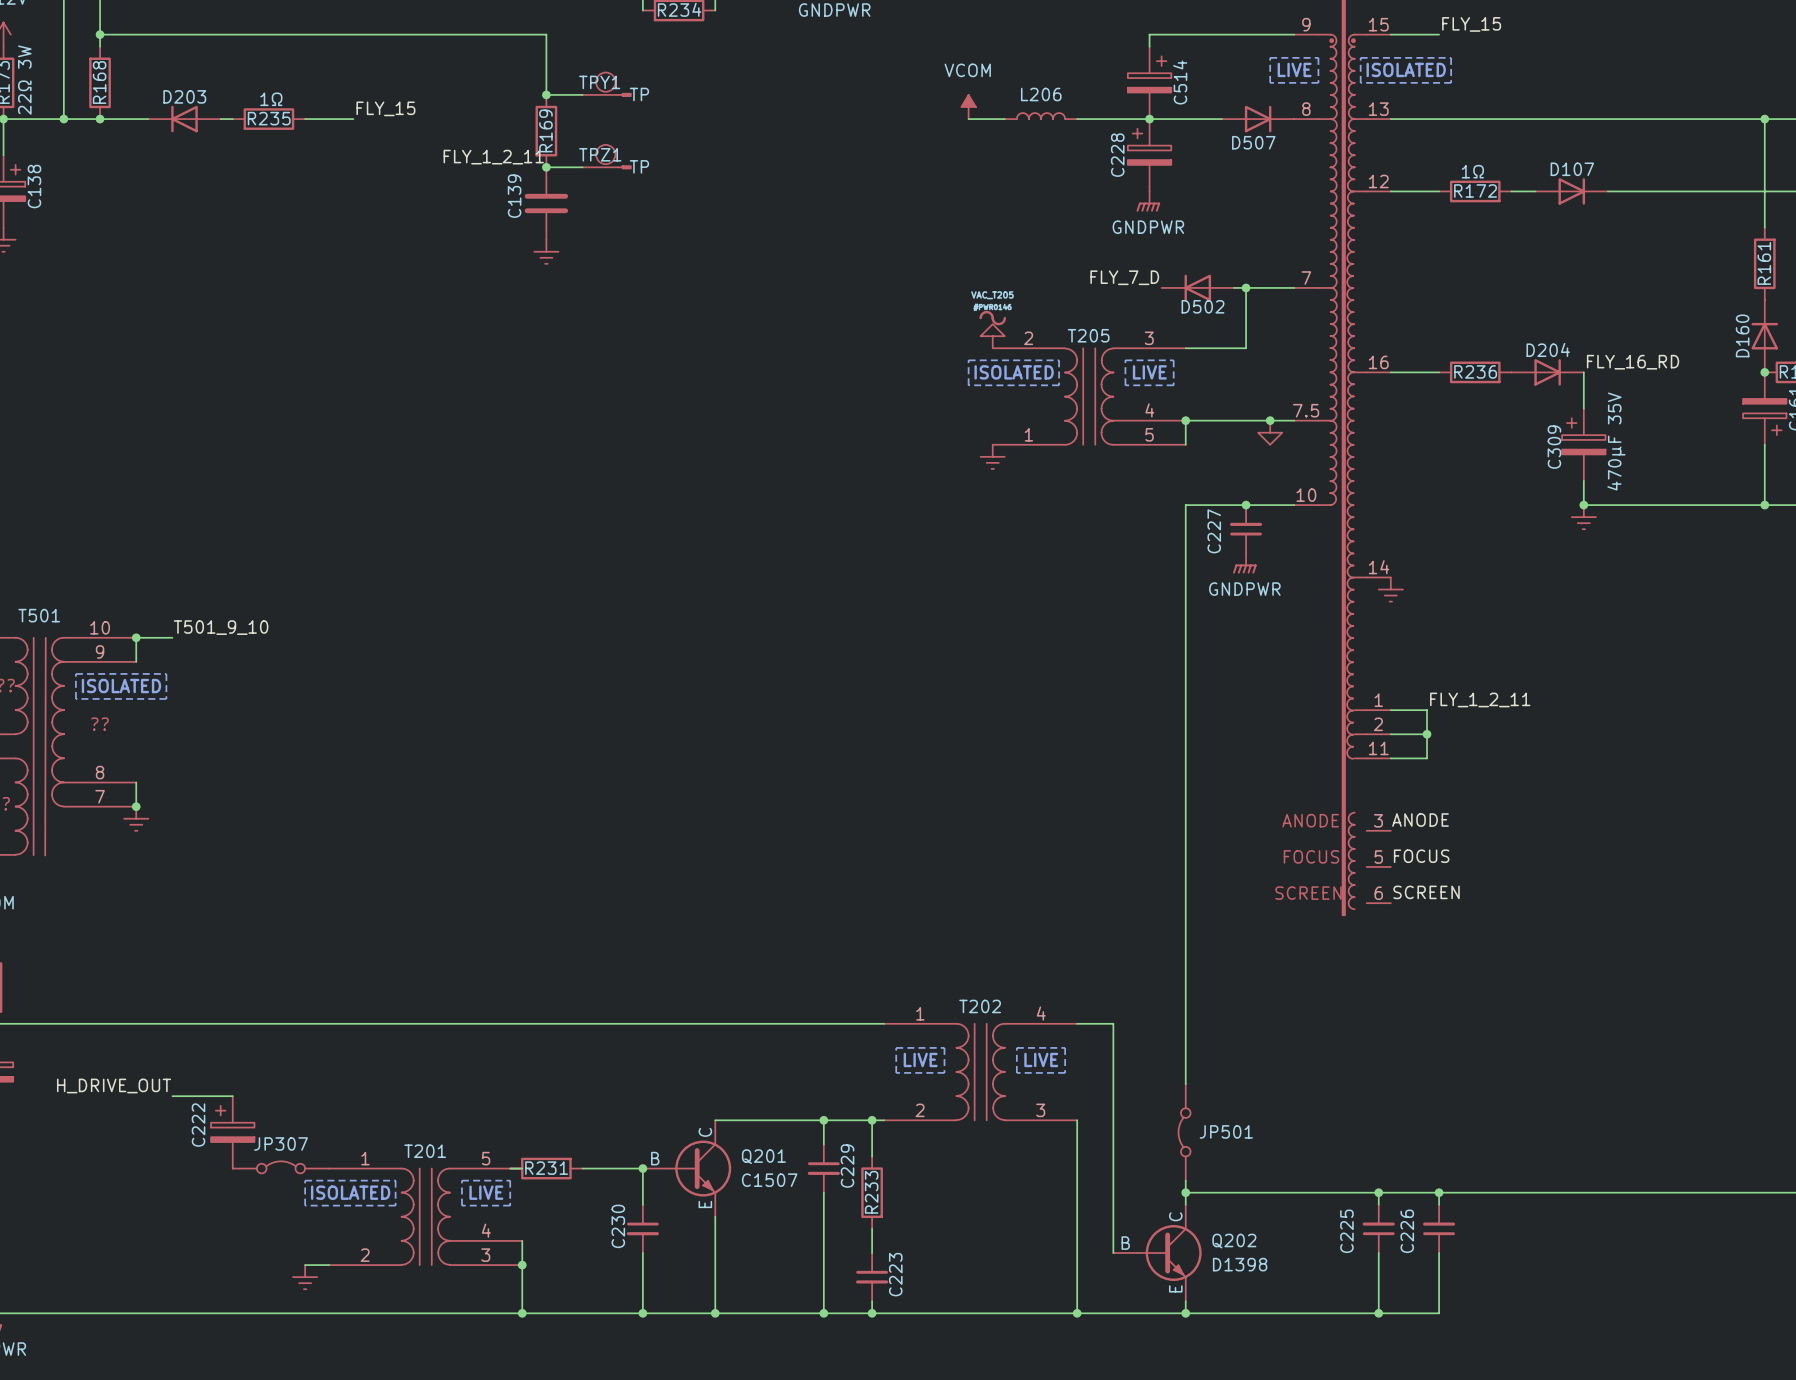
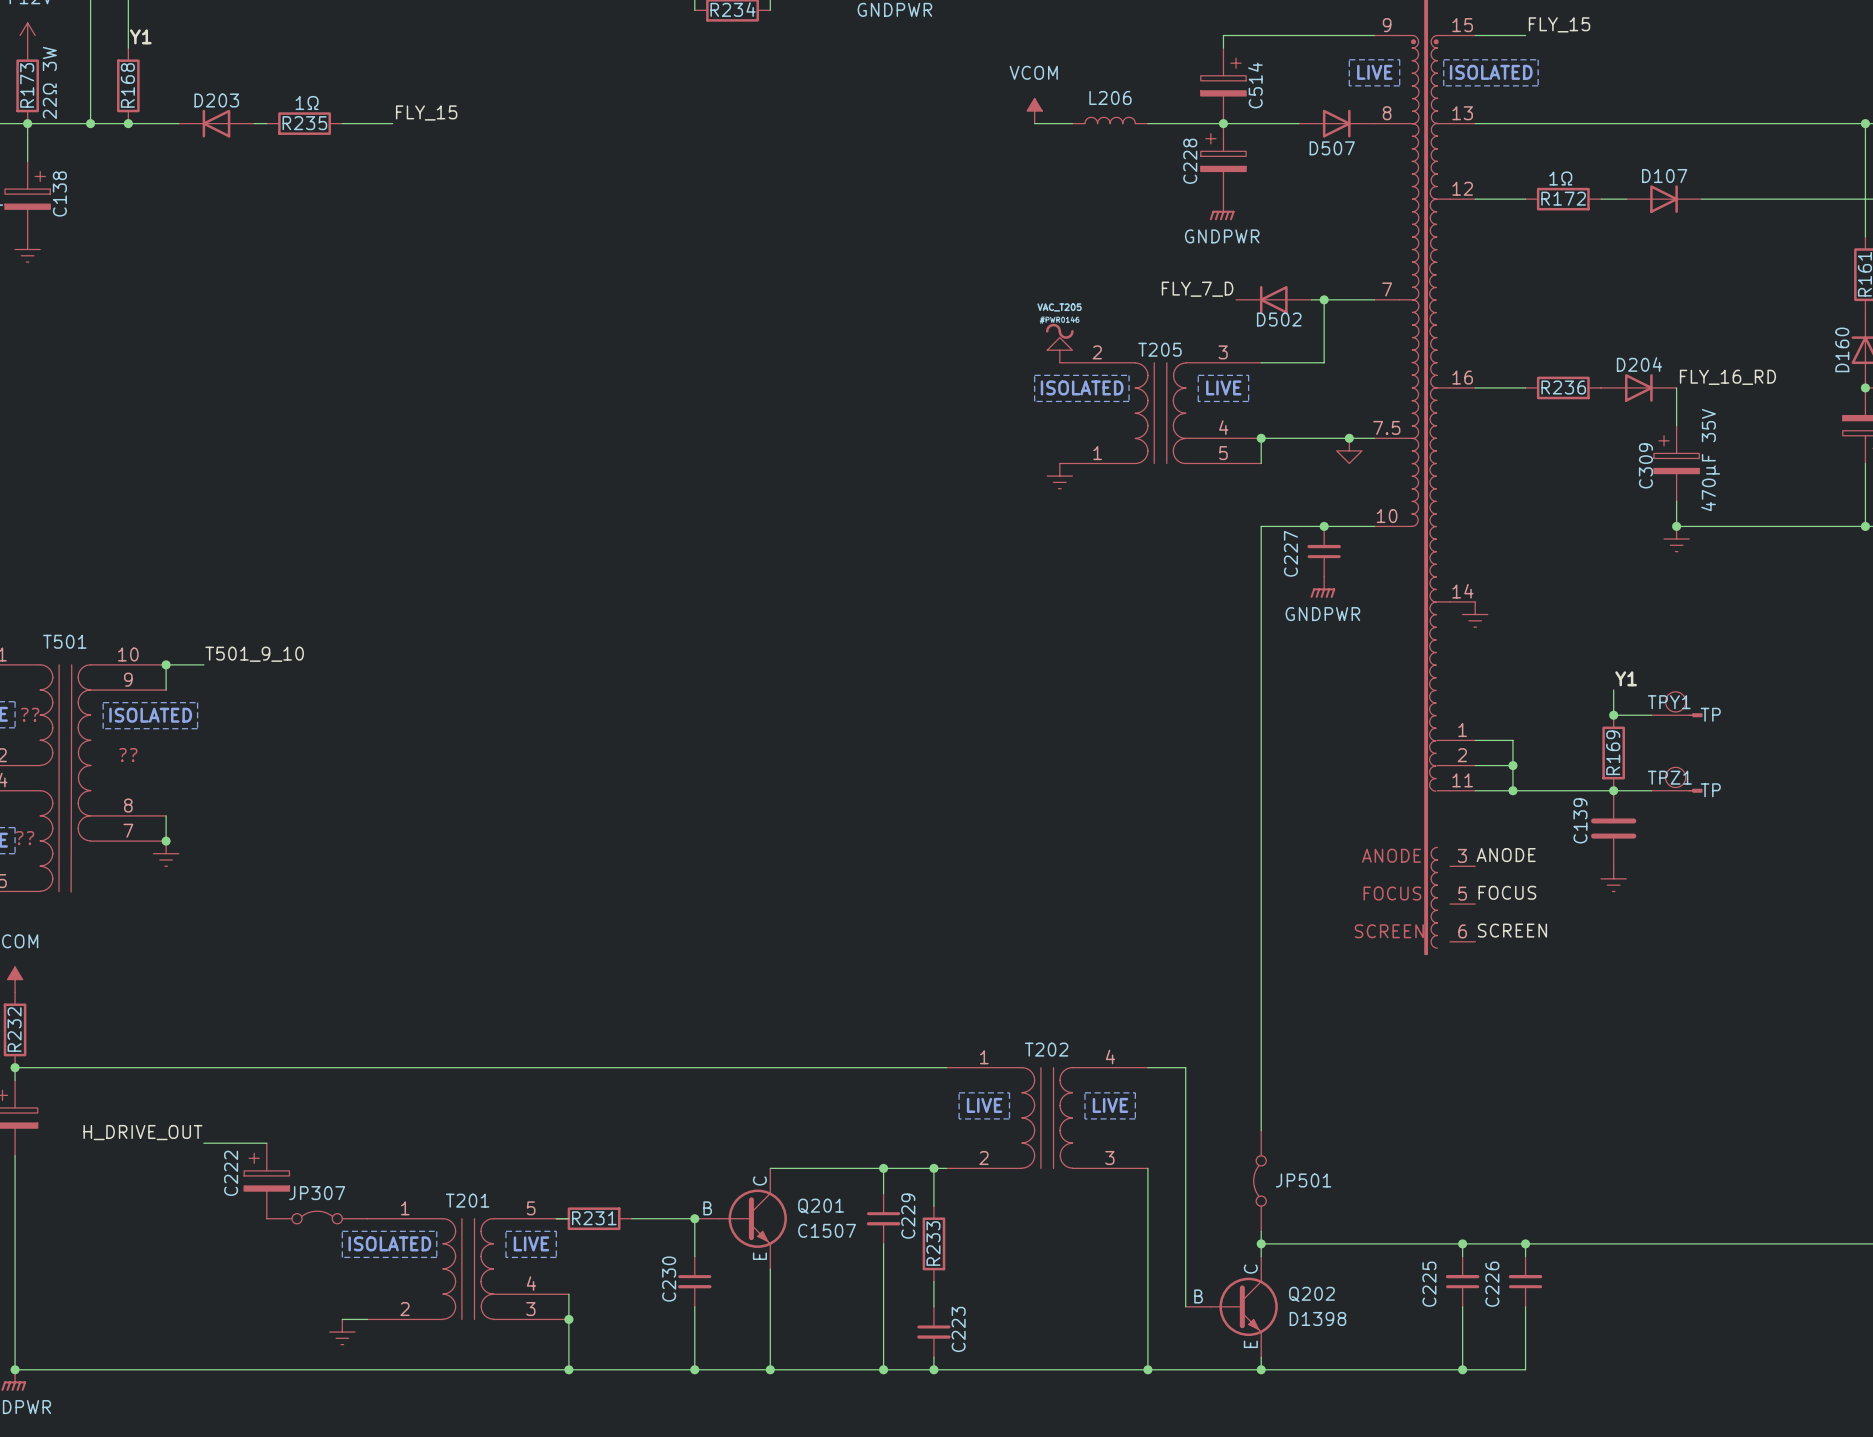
wire: (100, 34) (546, 34) (546, 94) (582, 94) -> none
junction: (100, 34) -> none
label: none -> Y1 (140, 36)
TPY1 position: (607, 84) -> (1676, 704)
junction: (546, 94) -> none
R169 position: (546, 131) -> (1613, 752)
label: FLY_1_2_11 (493, 157) -> none
TPZ1 position: (607, 157) -> (1676, 780)
wire: (546, 167) (582, 167) -> none
junction: (546, 167) -> none
C139 position: (546, 203) -> (1613, 828)
power symbol: (546, 251) -> none
label: none -> Y1 (1626, 678)
wire: none -> (1613, 690) (1613, 715) (1651, 715)
junction: none -> (1613, 715)
label: FLY_1_2_11 (1480, 699) -> none
wire: none -> (1512, 790) (1651, 790)
junction: none -> (1512, 790)
junction: none -> (1613, 790)
power symbol: none -> (1613, 878)

